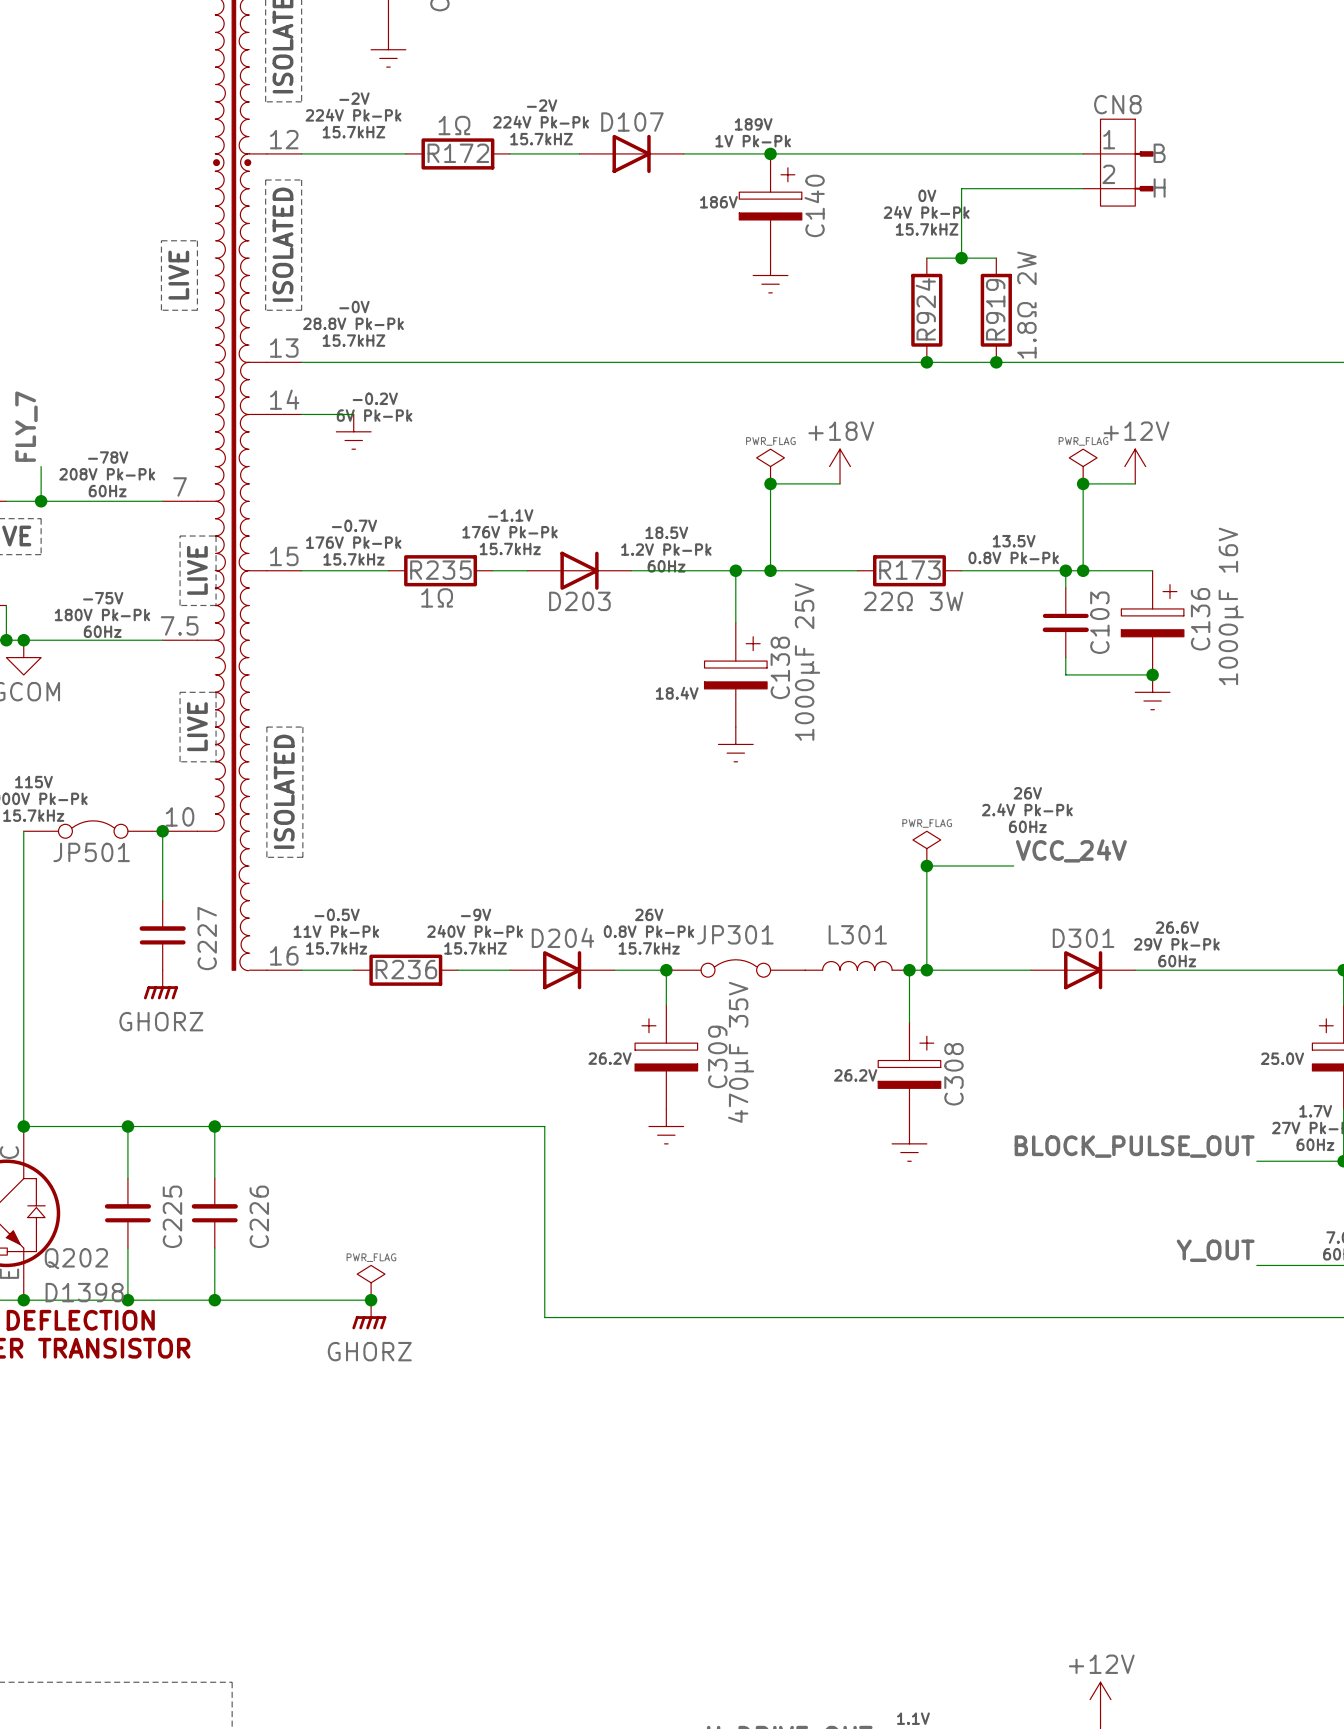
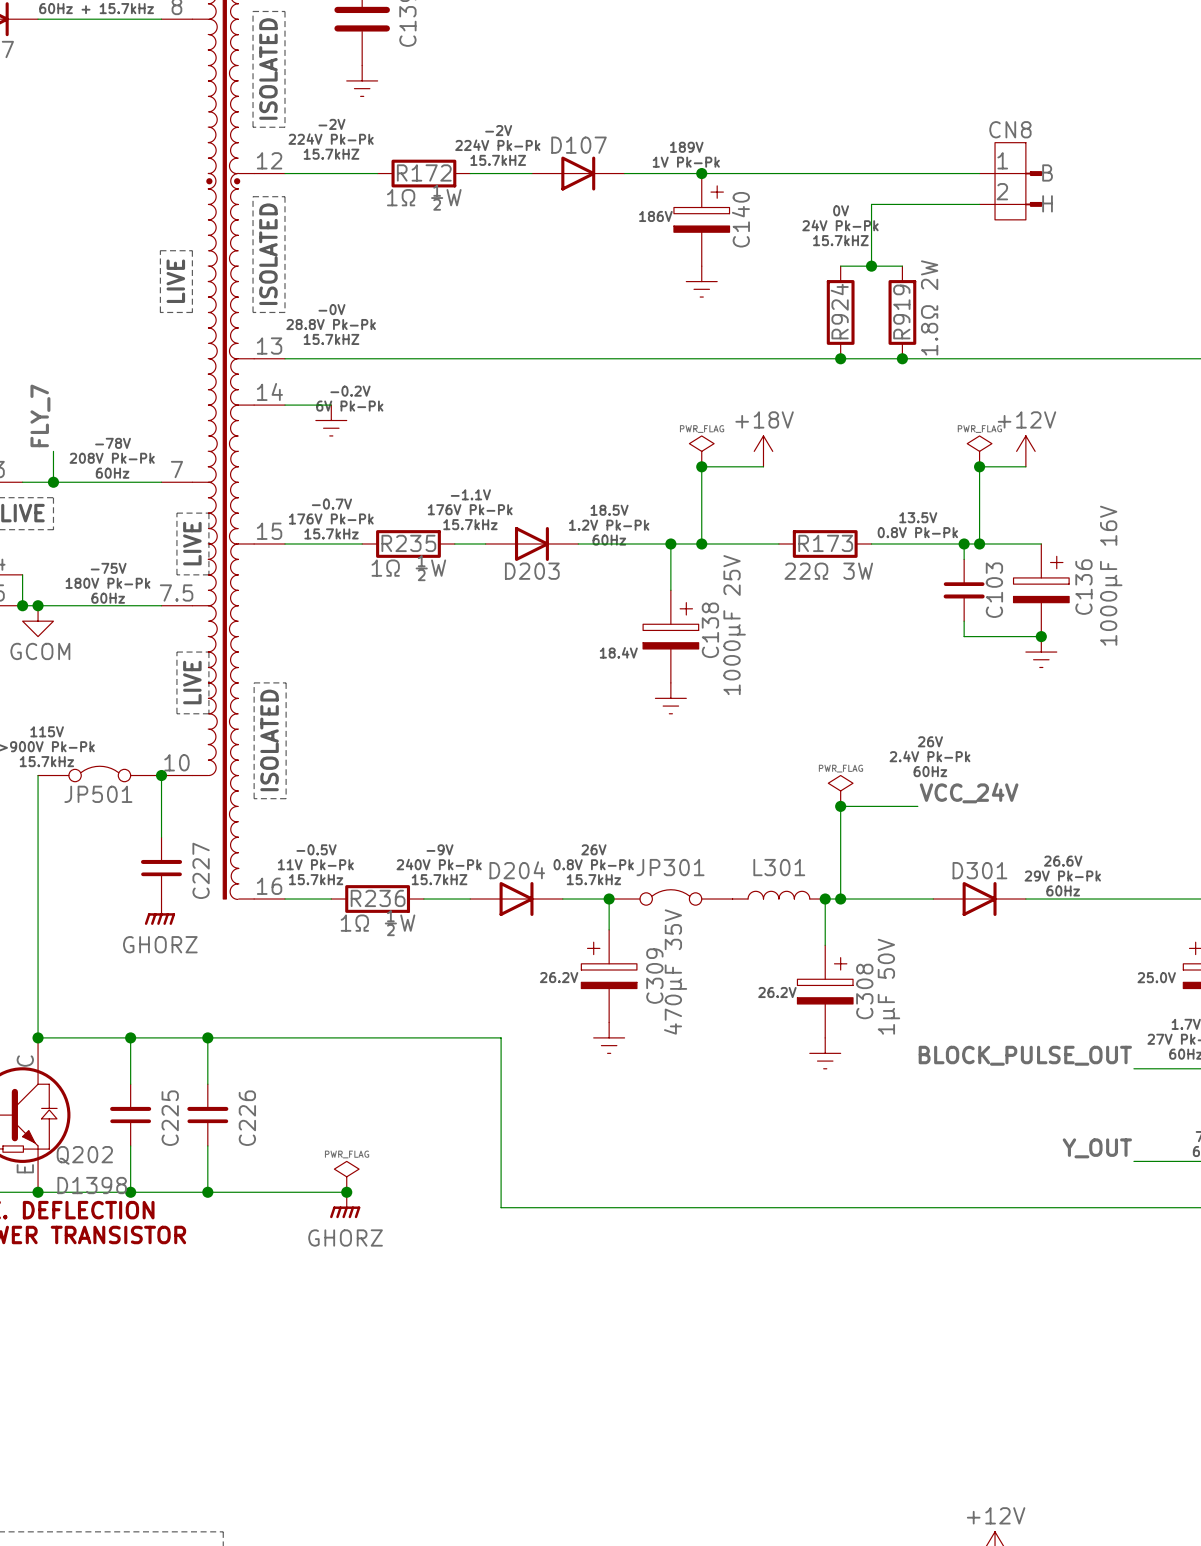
R172 value: 1Ω (454, 125) -> 1Ω ½W (424, 197)
R235 value: 1Ω (437, 597) -> 1Ω ½W (408, 568)
R236 value: none -> 1Ω ½W (378, 923)
C308 value: none -> 1µF 50V (888, 986)

